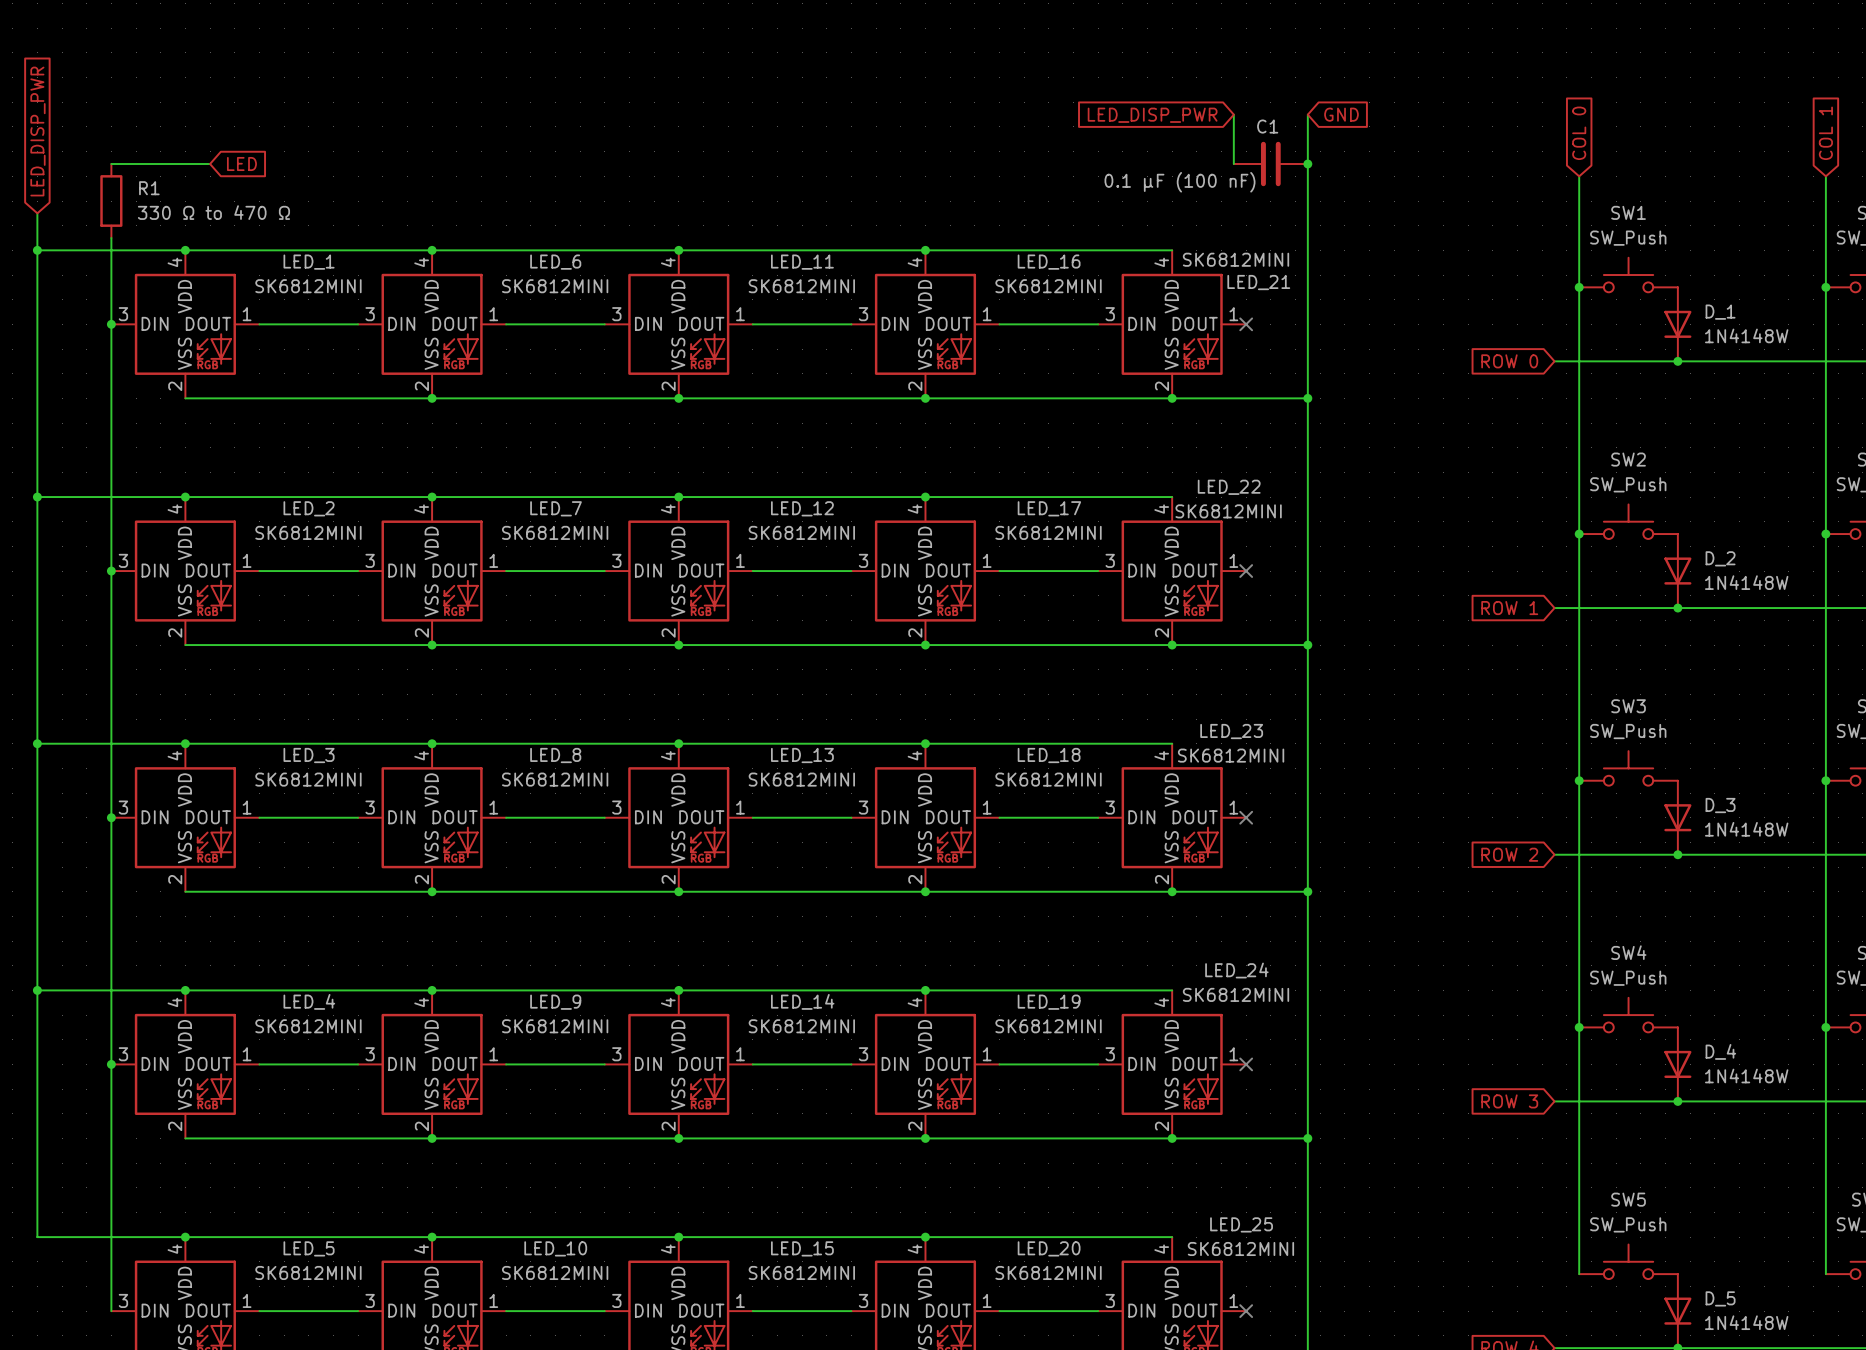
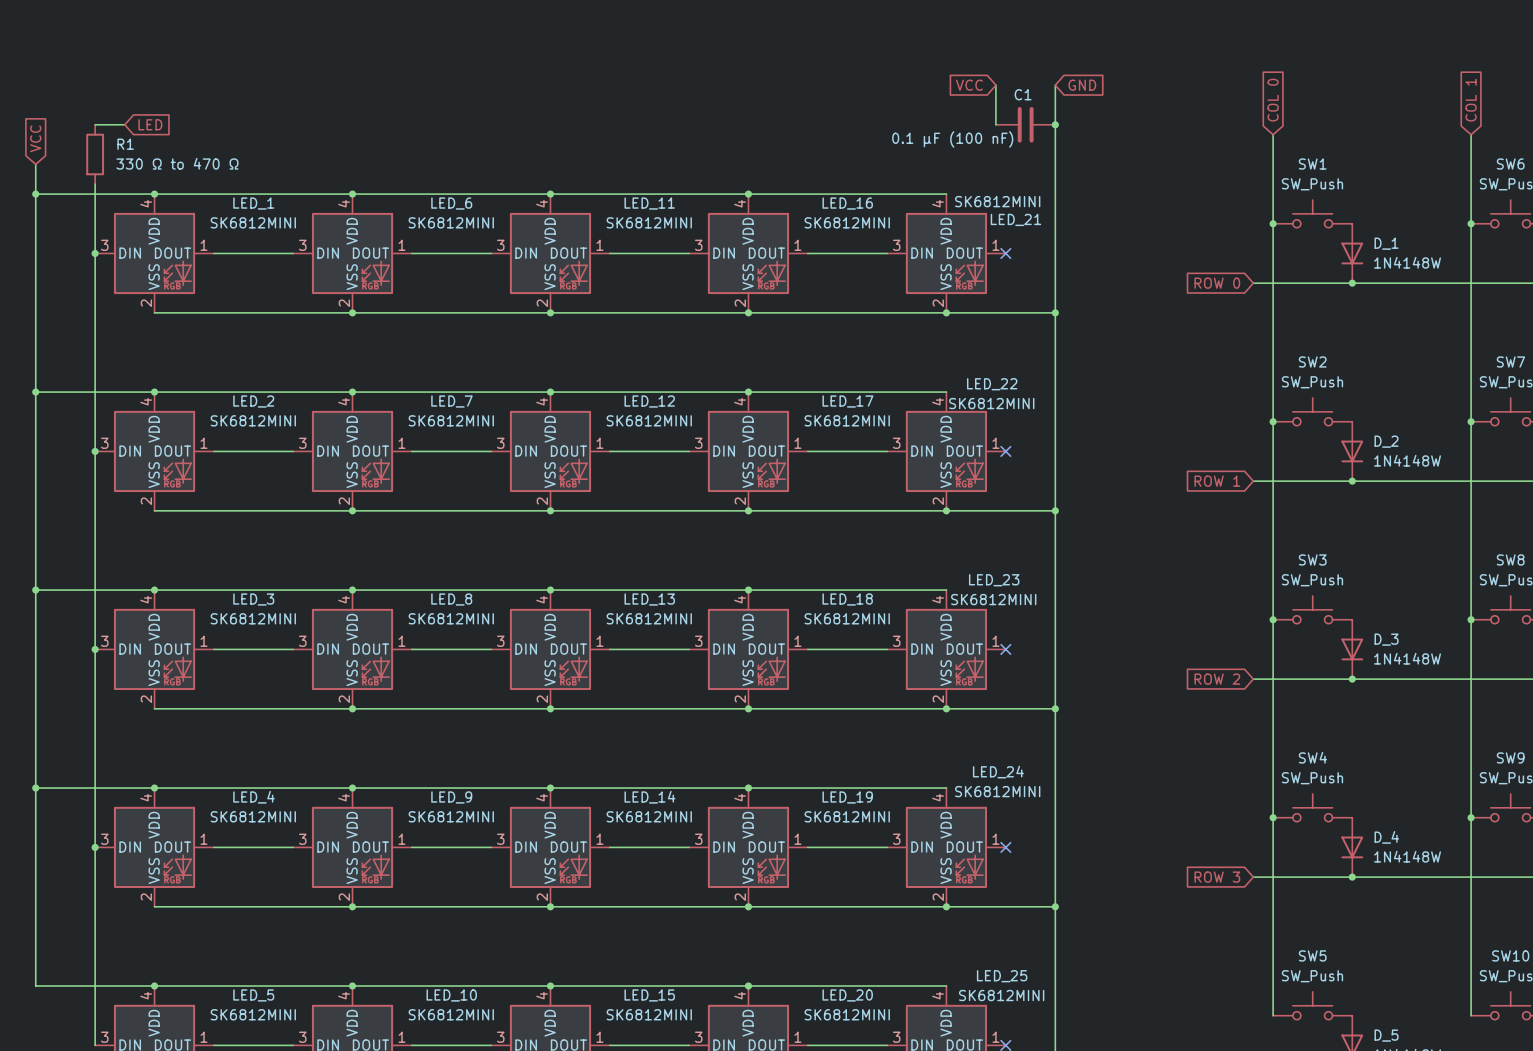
global label: LED_DISP_PWR (1152, 115) -> VCC (969, 85)
global label: LED_DISP_PWR (37, 131) -> VCC (35, 138)
wire: (148, 164) (210, 164) -> none
global label position: LED (241, 164) -> LED (150, 124)

